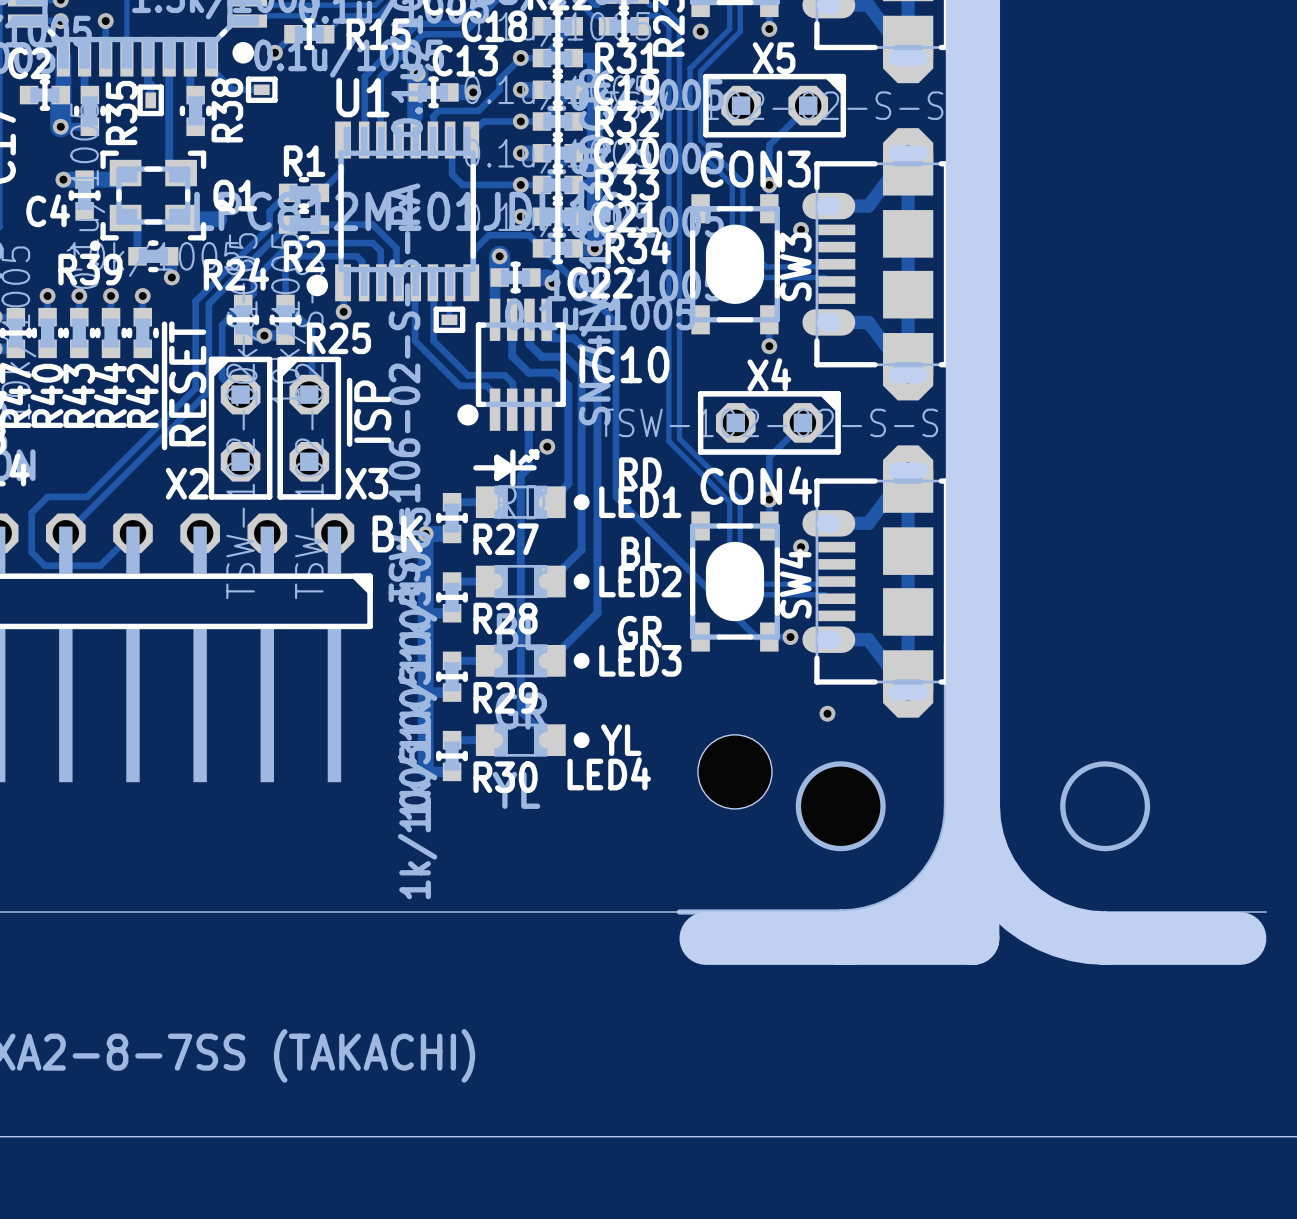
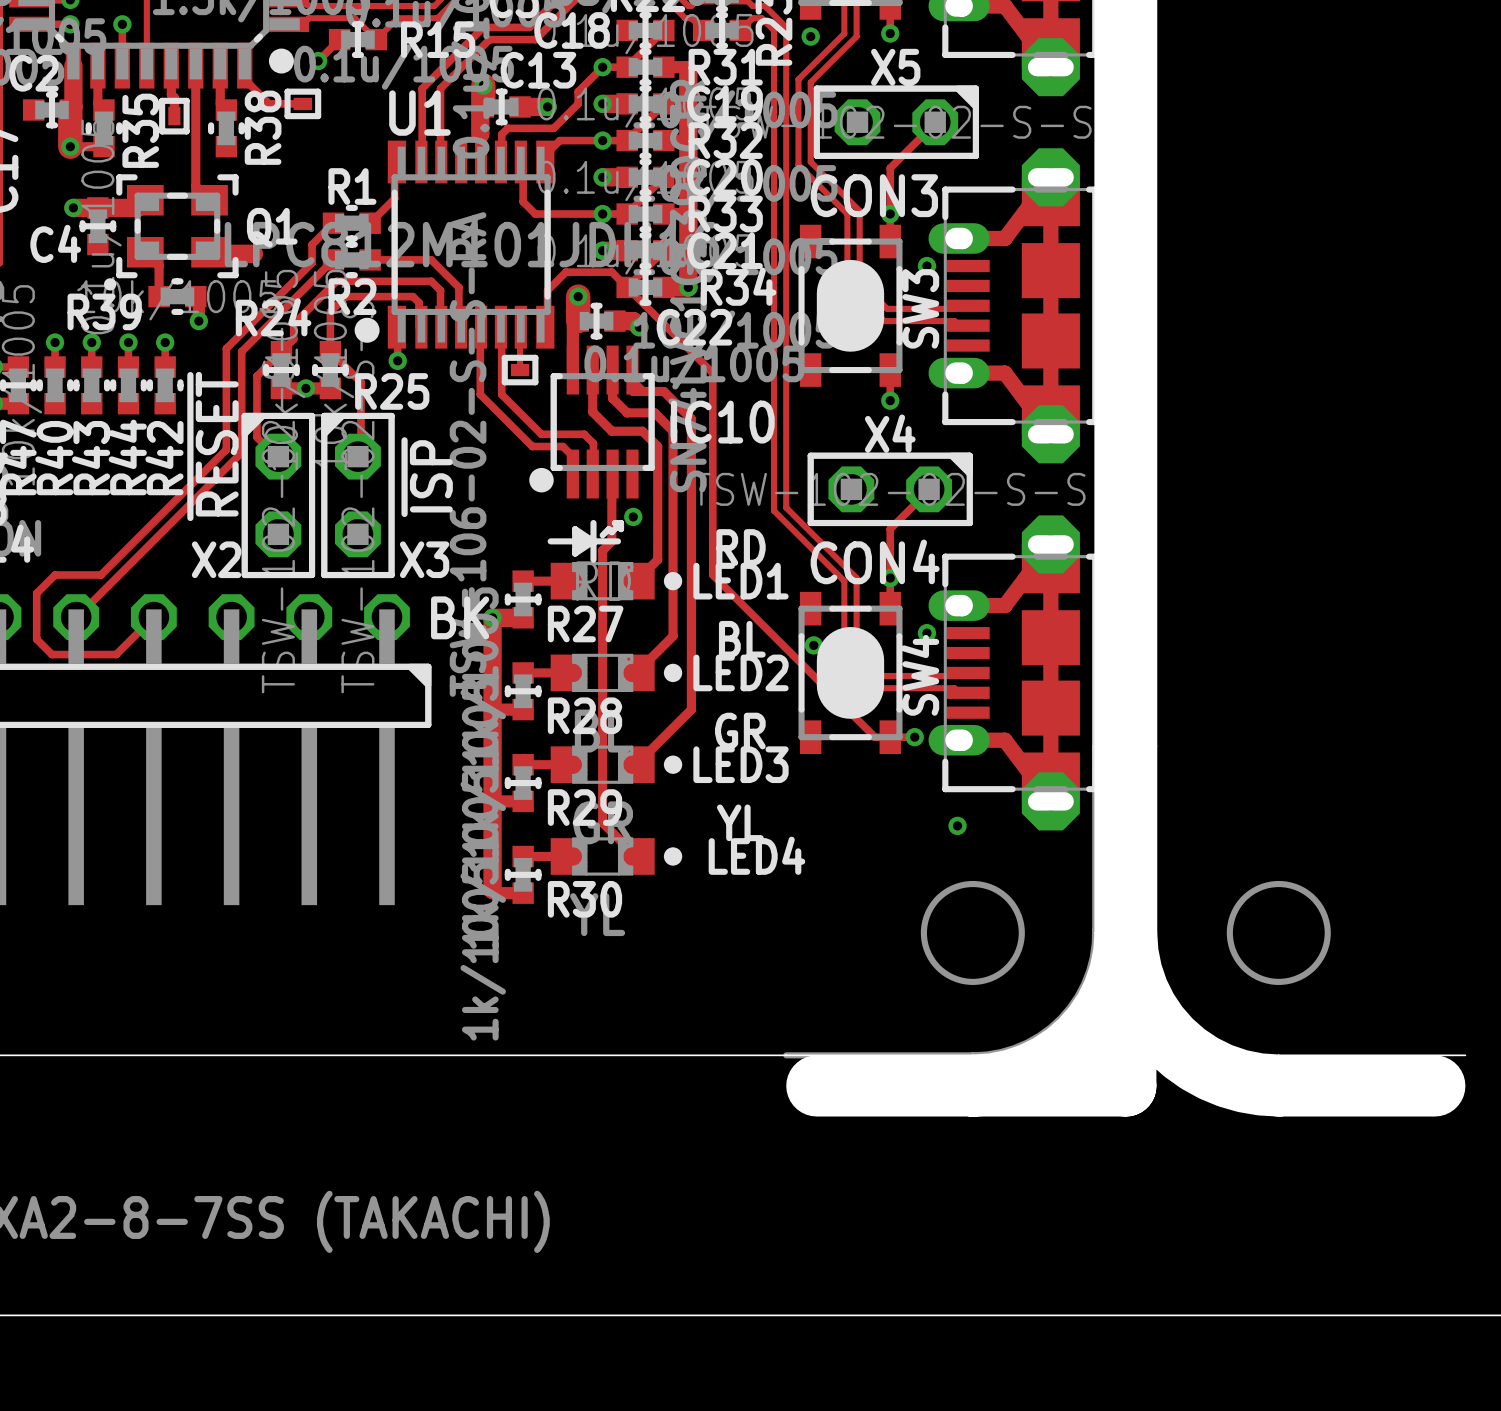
via: none -> (813, 645)
text position: YL (621, 740) -> YL (740, 822)
hole: (734, 771) -> none
LED4 name position: LED4 (609, 773) -> LED4 (756, 855)

